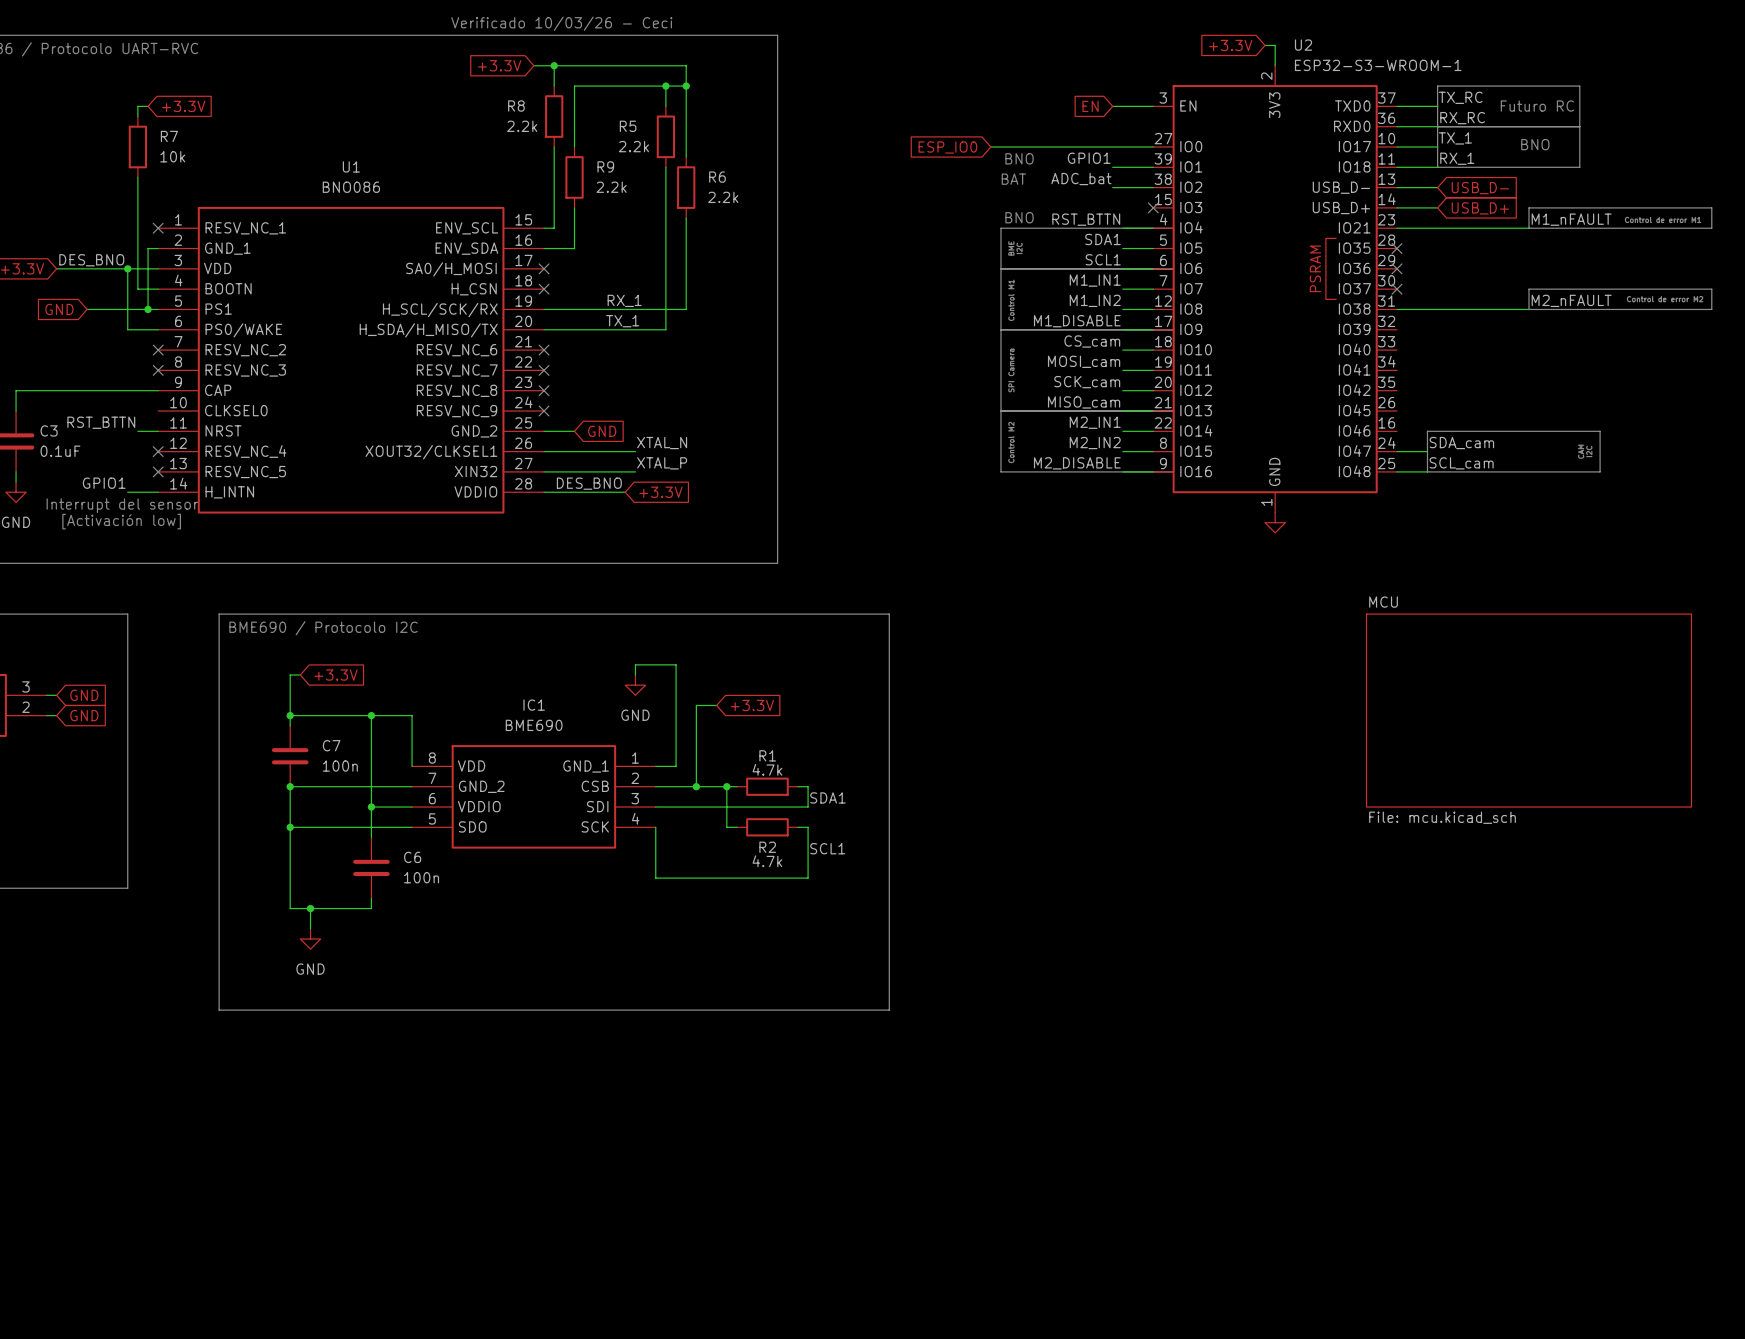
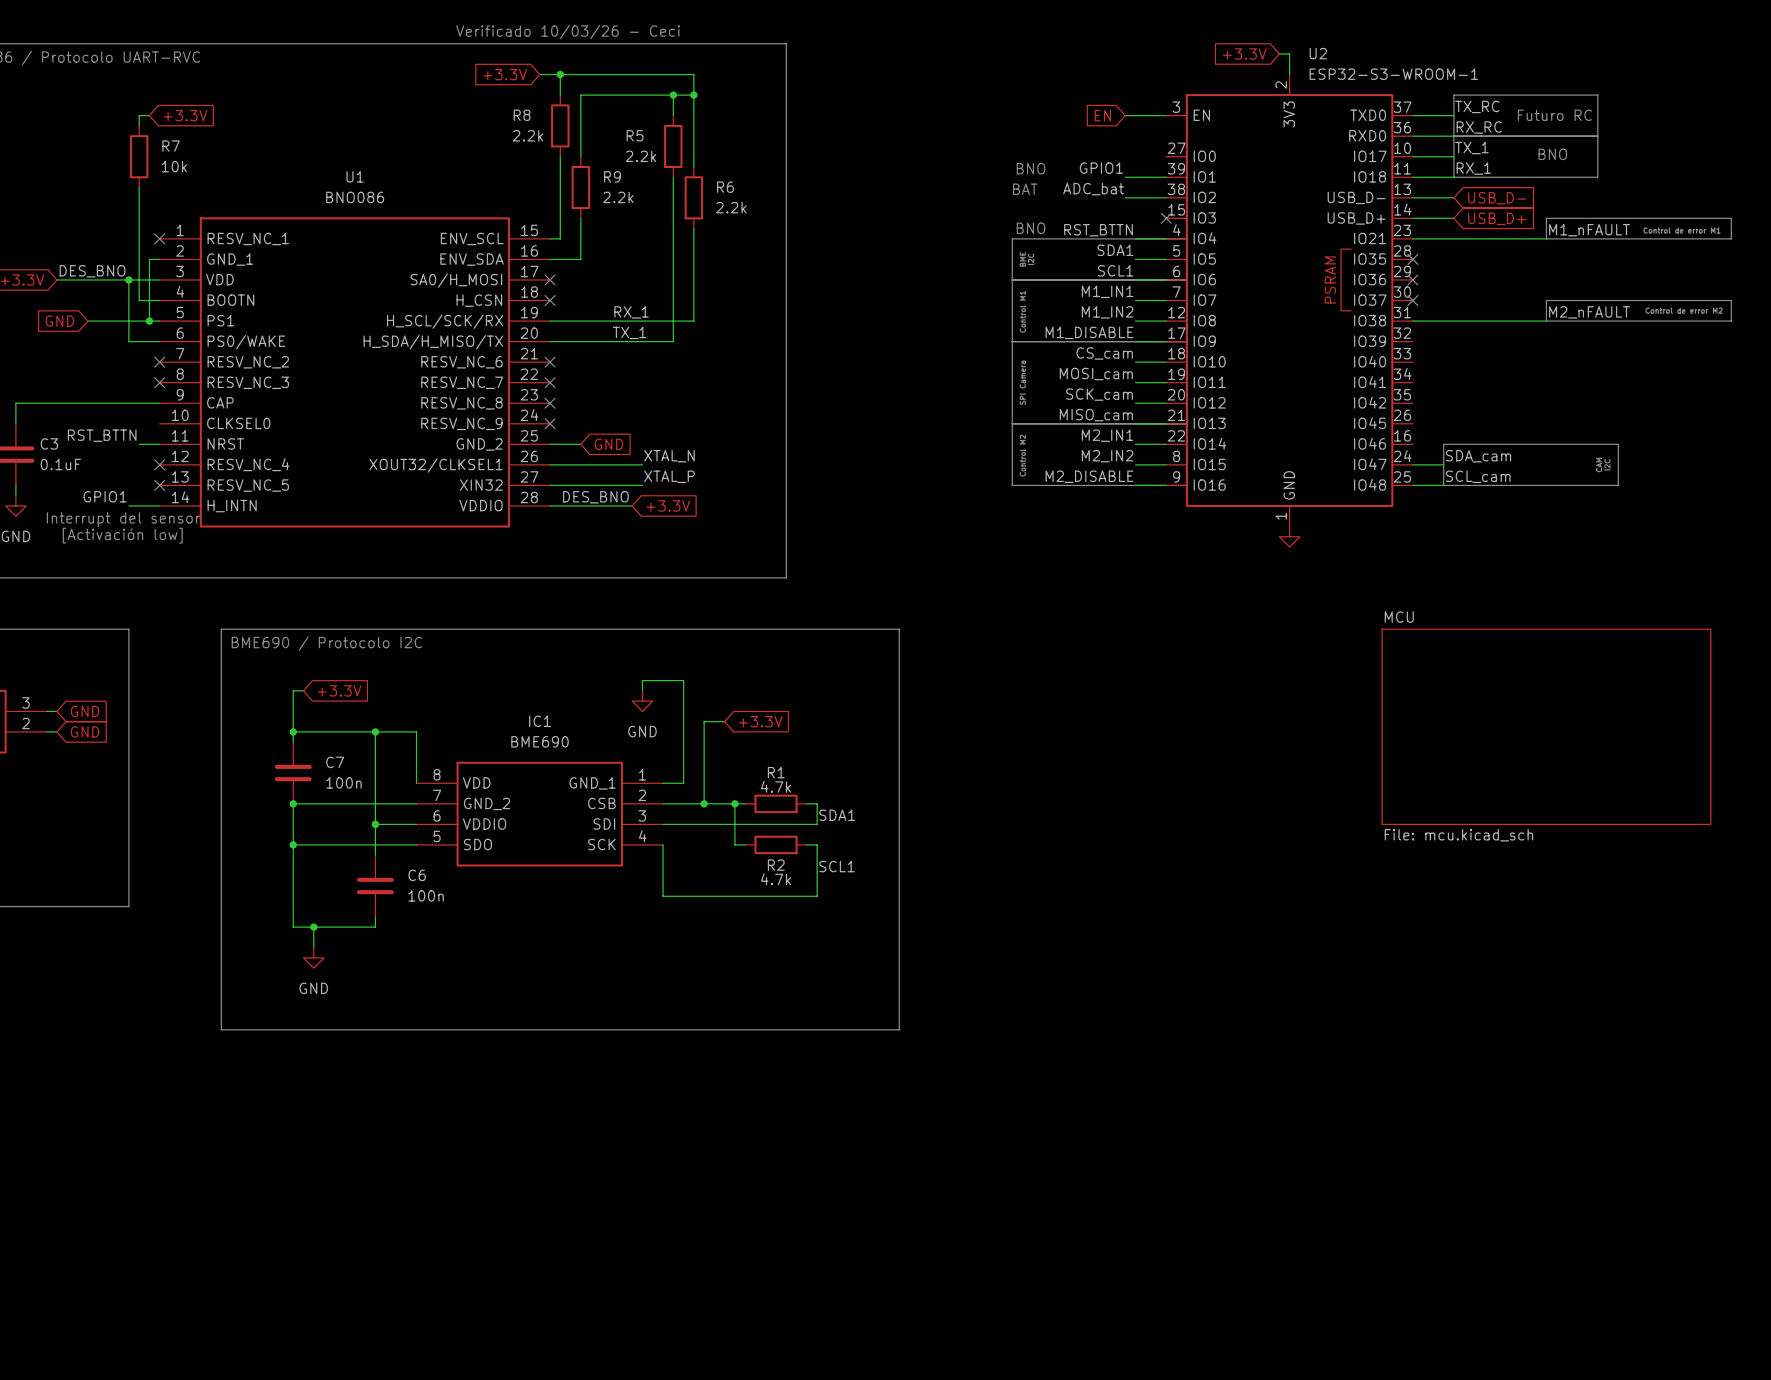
wire: (990, 146) (1153, 146) -> none
global label: ESP_IO0 (947, 147) -> none

